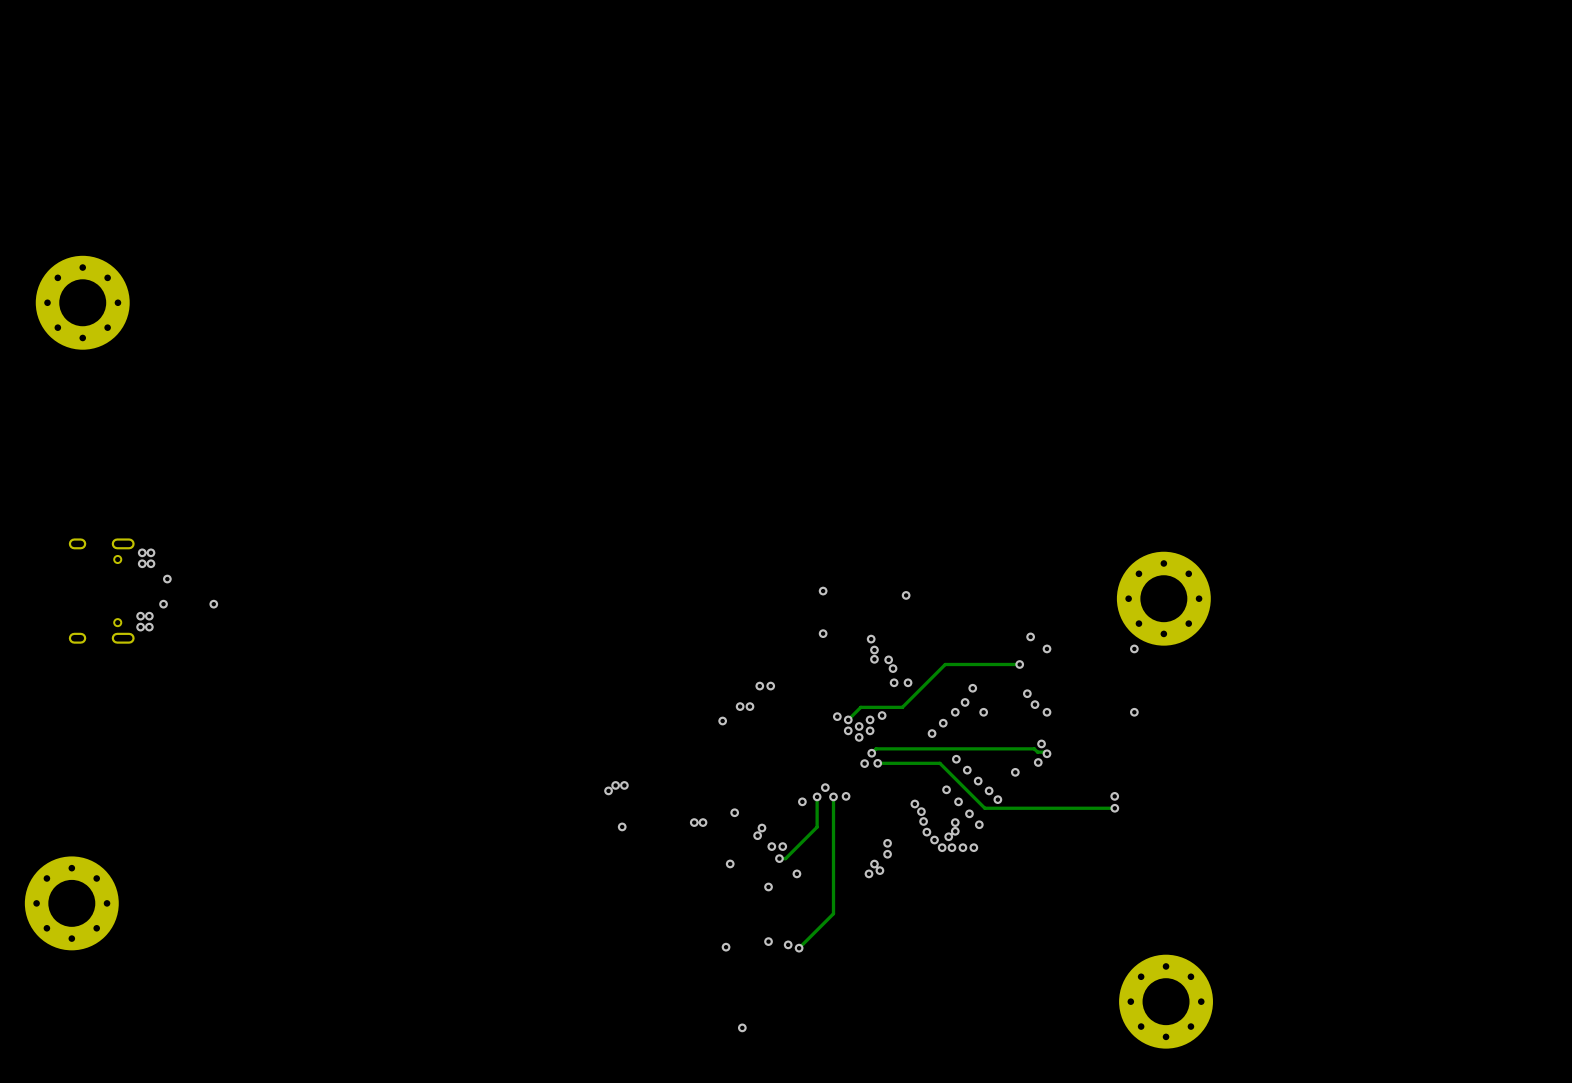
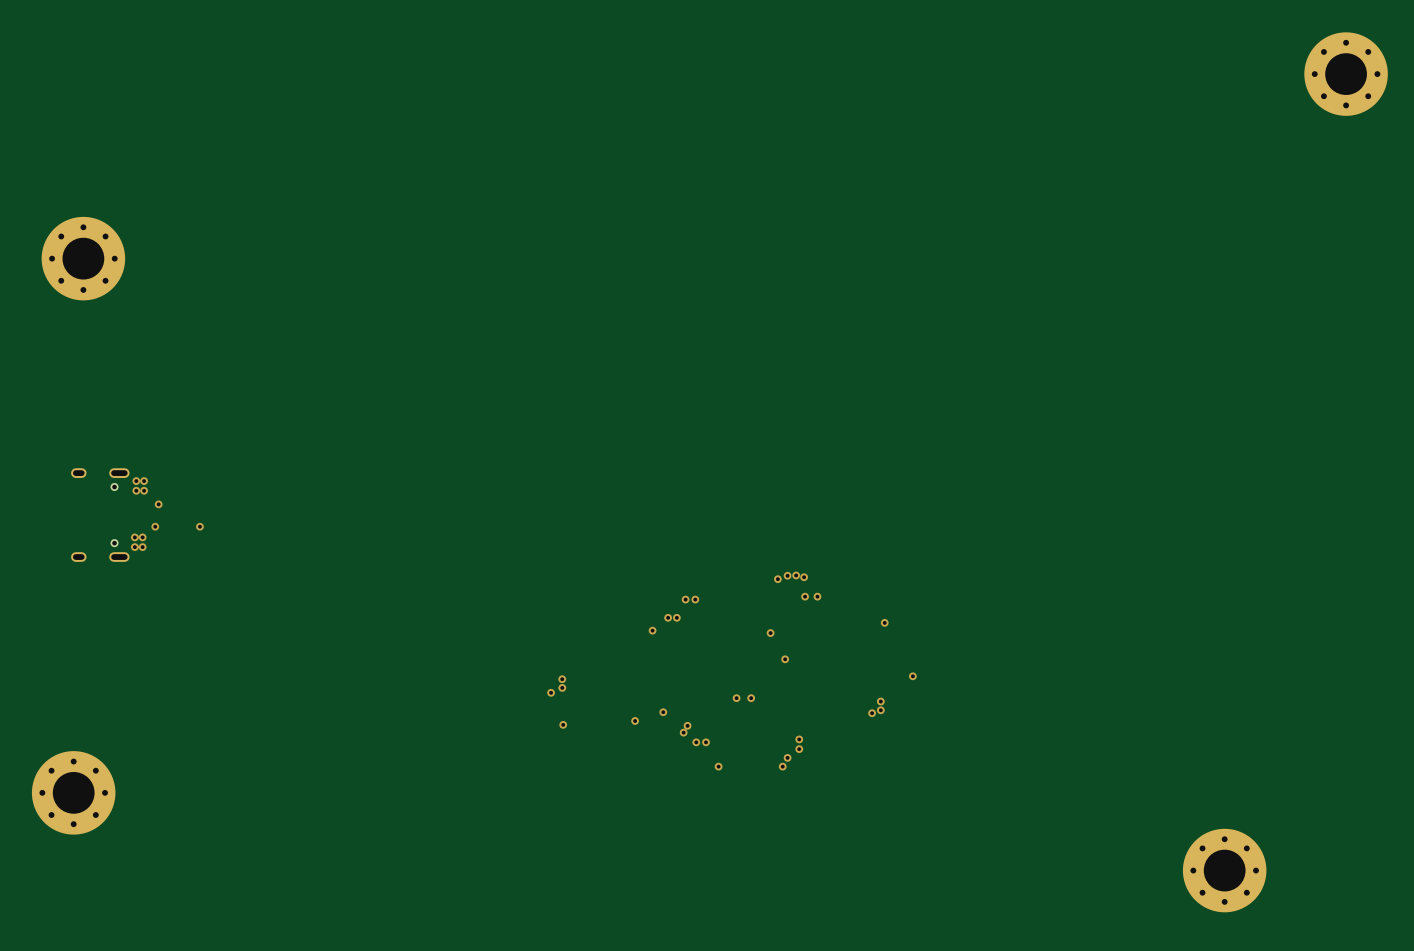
part: none -> (1346, 74)
via: (823, 591) -> none
via: (906, 595) -> none
part: (1163, 598) -> none
via: (823, 633) -> none
via: (1030, 636) -> none
via: (871, 639) -> none
via: (1047, 648) -> none
via: (1134, 648) -> none
via: (874, 650) -> none
via: none -> (796, 575)
via: (888, 659) -> none
via: none -> (804, 577)
via: none -> (777, 579)
track: (1019, 664) (945, 664) (902, 707) (860, 707) (848, 719) -> none
via: (1019, 664) -> none
via: (893, 668) -> none
via: (972, 688) -> none
via: (1027, 693) -> none
via: (965, 702) -> none
via: (1034, 704) -> none
via: (955, 712) -> none
via: (1047, 712) -> none
via: (1134, 712) -> none
via: (882, 715) -> none
via: (837, 716) -> none
via: (848, 719) -> none
via: (870, 719) -> none
via: none -> (770, 633)
via: (943, 723) -> none
via: (859, 726) -> none
via: (848, 730) -> none
via: (870, 730) -> none
via: (932, 733) -> none
via: (859, 737) -> none
via: (1041, 743) -> none
track: (871, 753) (876, 748) (1034, 748) (1037, 752) (1047, 753) -> none
via: (1047, 753) -> none
via: (956, 759) -> none
via: (1038, 762) -> none
via: (864, 763) -> none
track: (877, 763) (939, 763) (984, 808) (1114, 808) -> none
via: (877, 763) -> none
via: (967, 770) -> none
via: none -> (562, 679)
via: (978, 781) -> none
via: (615, 785) -> none
via: none -> (562, 687)
via: (624, 785) -> none
via: (825, 787) -> none
via: (946, 789) -> none
via: (989, 790) -> none
track: (817, 796) (817, 827) (785, 858) (779, 858) -> none
track: (833, 796) (833, 913) (799, 948) -> none
via: (846, 796) -> none
via: (1114, 796) -> none
via: (997, 799) -> none
via: none -> (880, 701)
via: (802, 801) -> none
via: (958, 801) -> none
via: (914, 804) -> none
via: (1114, 808) -> none
via: none -> (880, 710)
via: (921, 811) -> none
via: (923, 821) -> none
via: (694, 822) -> none
via: (955, 822) -> none
via: (979, 824) -> none
via: (955, 831) -> none
via: (926, 832) -> none
via: (948, 836) -> none
via: (934, 840) -> none
via: (942, 847) -> none
via: (951, 847) -> none
via: (962, 847) -> none
via: (973, 847) -> none
via: (779, 858) -> none
via: (730, 863) -> none
via: (879, 870) -> none
via: (768, 887) -> none
via: (768, 941) -> none
via: (788, 944) -> none
via: (726, 947) -> none
via: (799, 948) -> none
part position: (1166, 1001) -> (1224, 870)
via: (742, 1027) -> none

